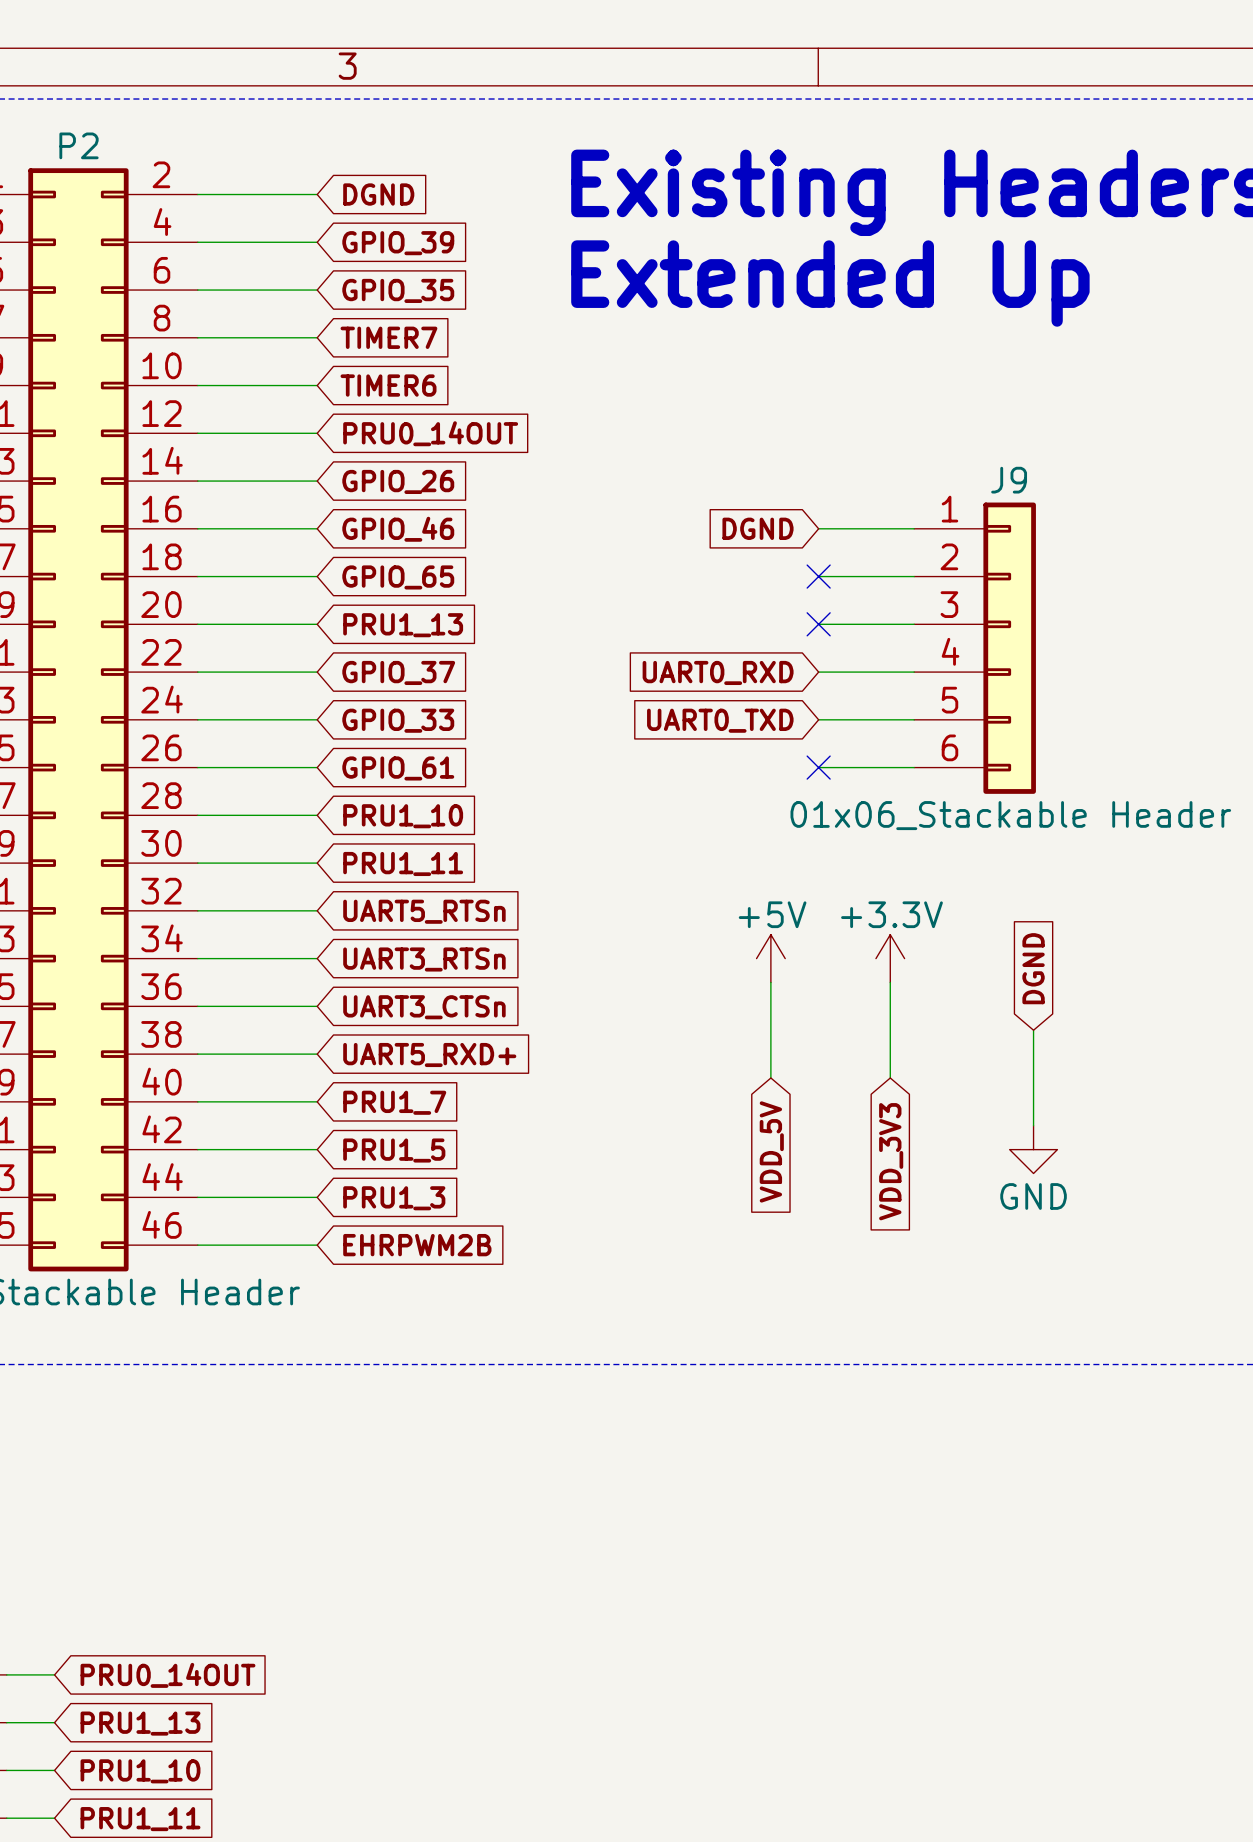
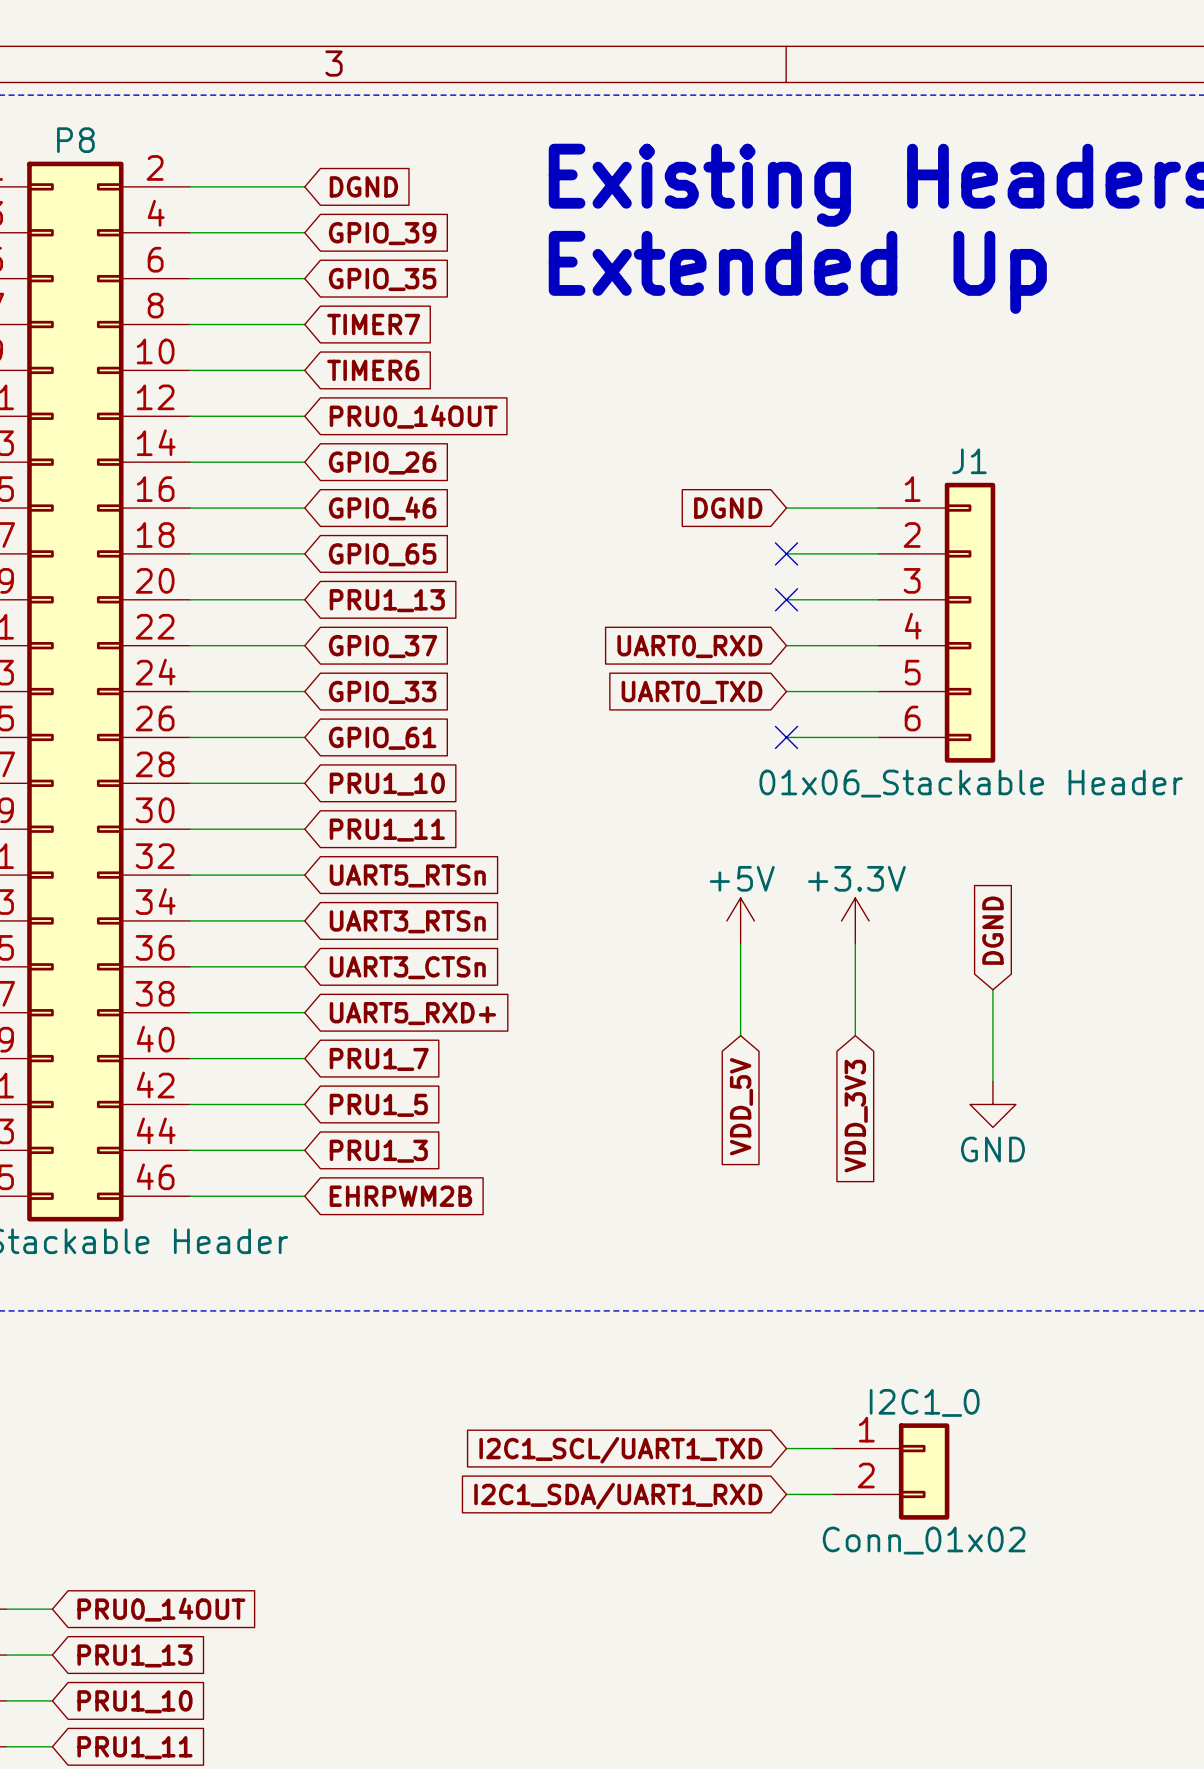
P2 name: P2 (79, 145) -> P8 (75, 140)
J9 name: J9 (1009, 480) -> J1 (969, 461)
wire: none -> (786, 1448) (832, 1448)
global label: none -> I2C1_SCL/UART1_TXD (620, 1450)
I2C1_0: none -> Conn_01x02 (890, 1471)
wire: none -> (786, 1494) (832, 1494)
global label: none -> I2C1_SDA/UART1_RXD (618, 1496)

